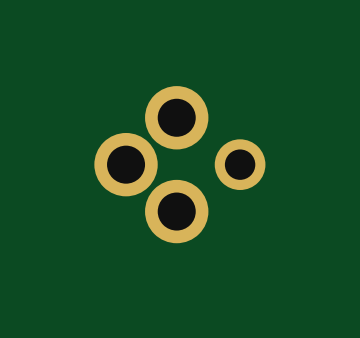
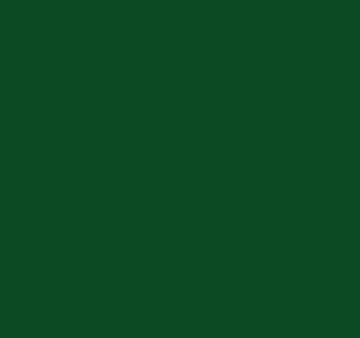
part: (179, 164) -> none

